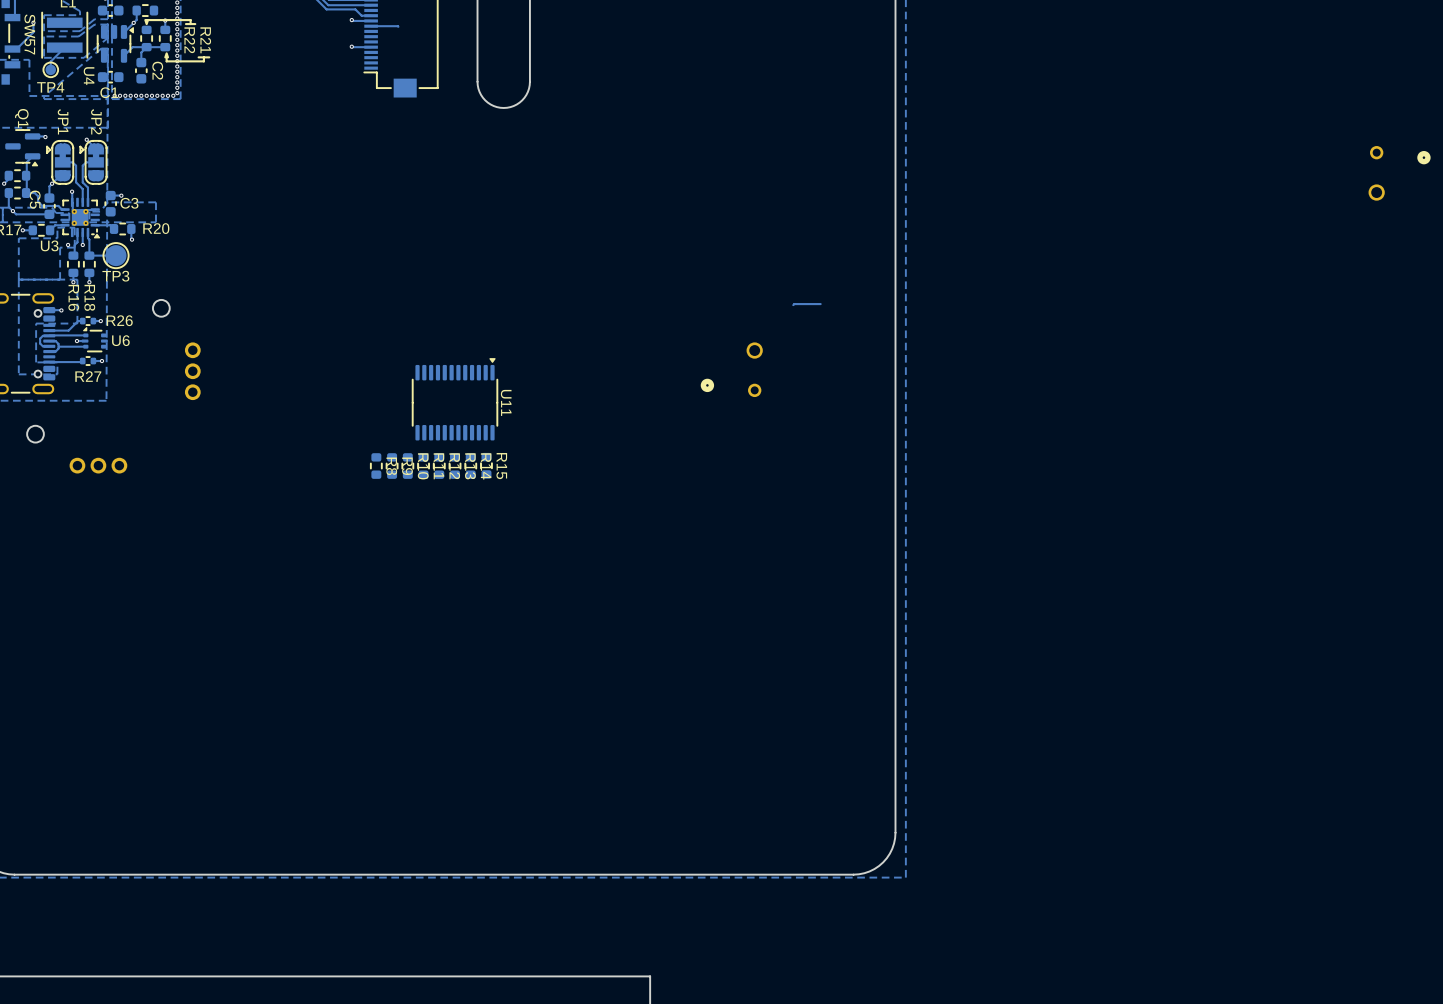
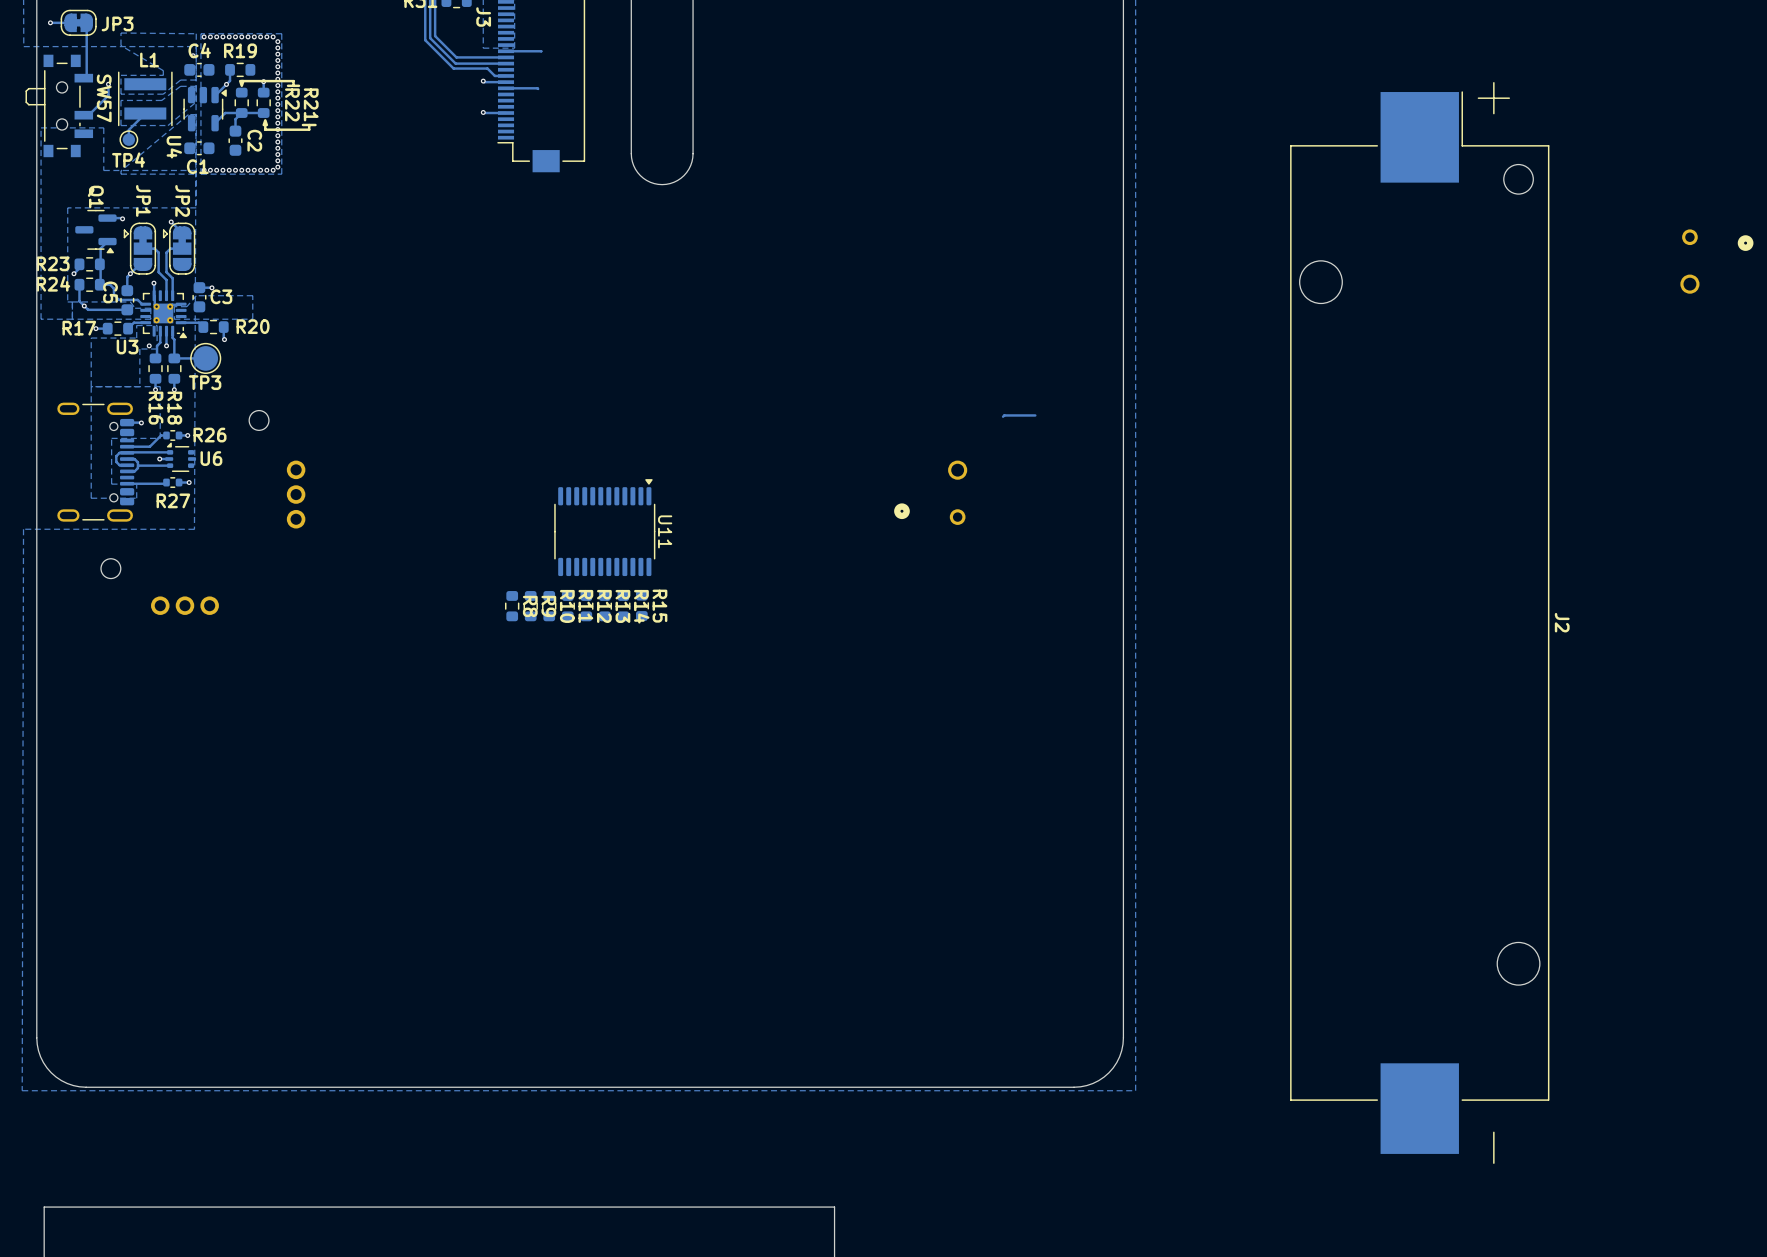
J2: none -> (1419, 622)

